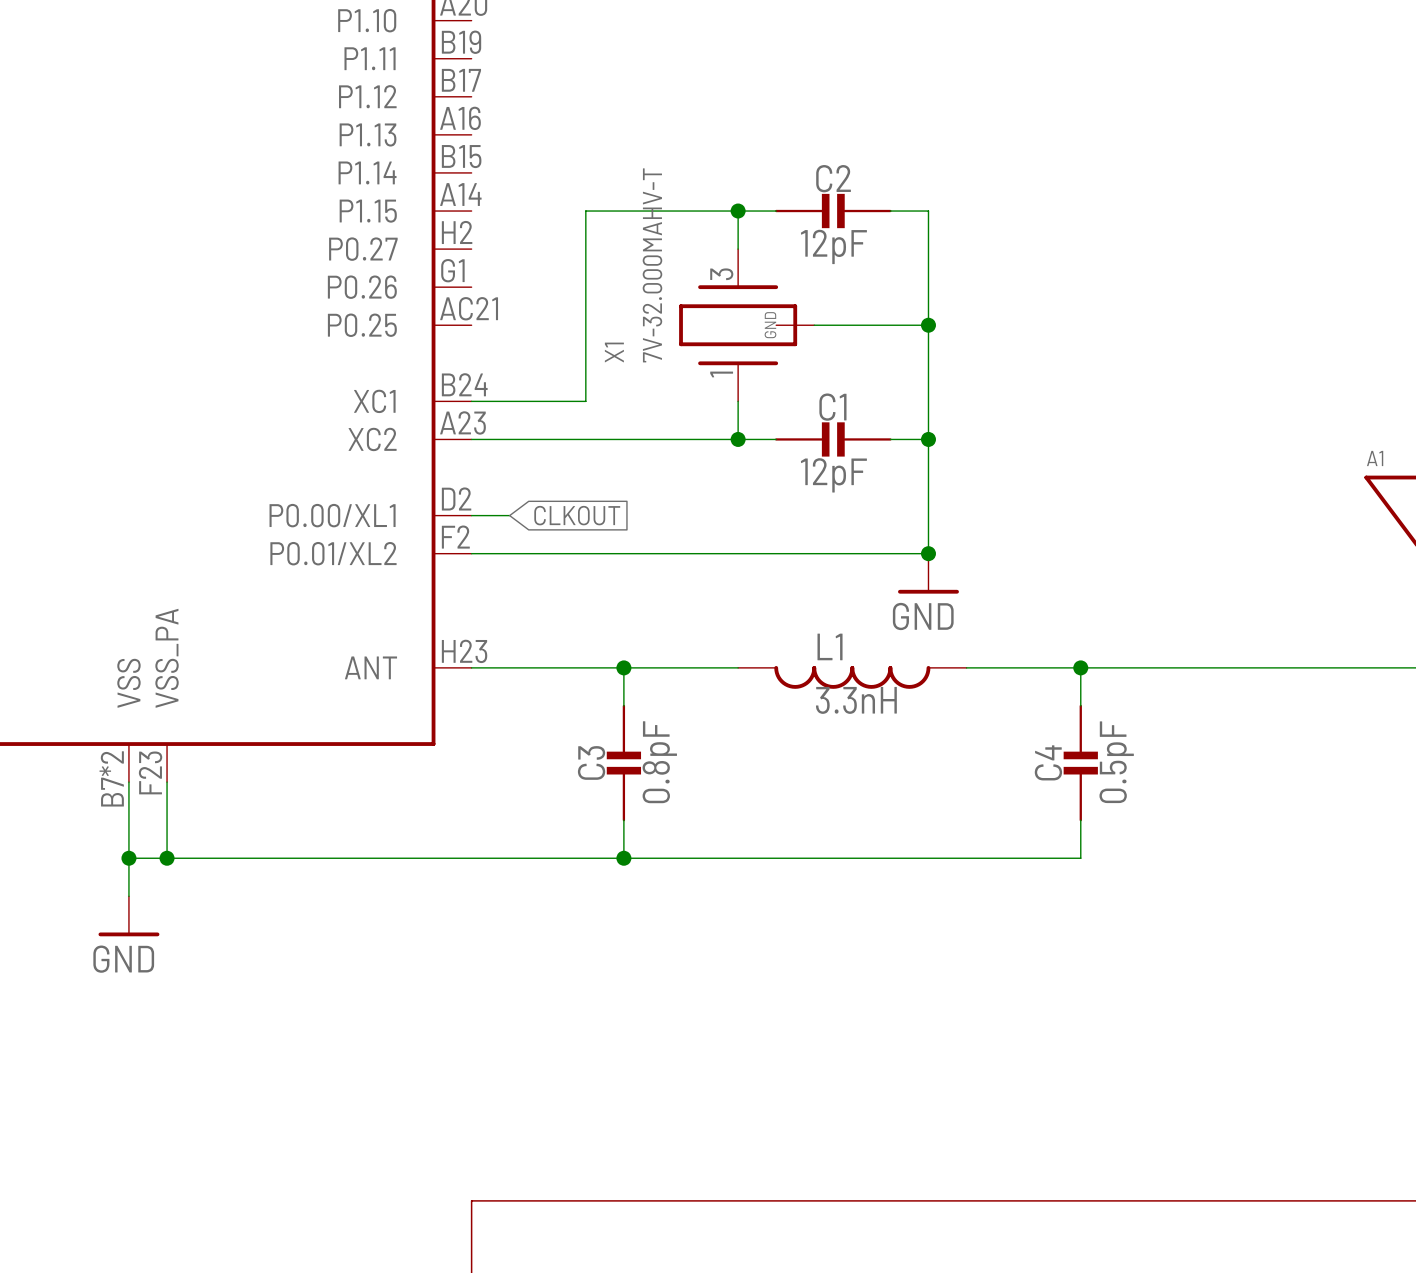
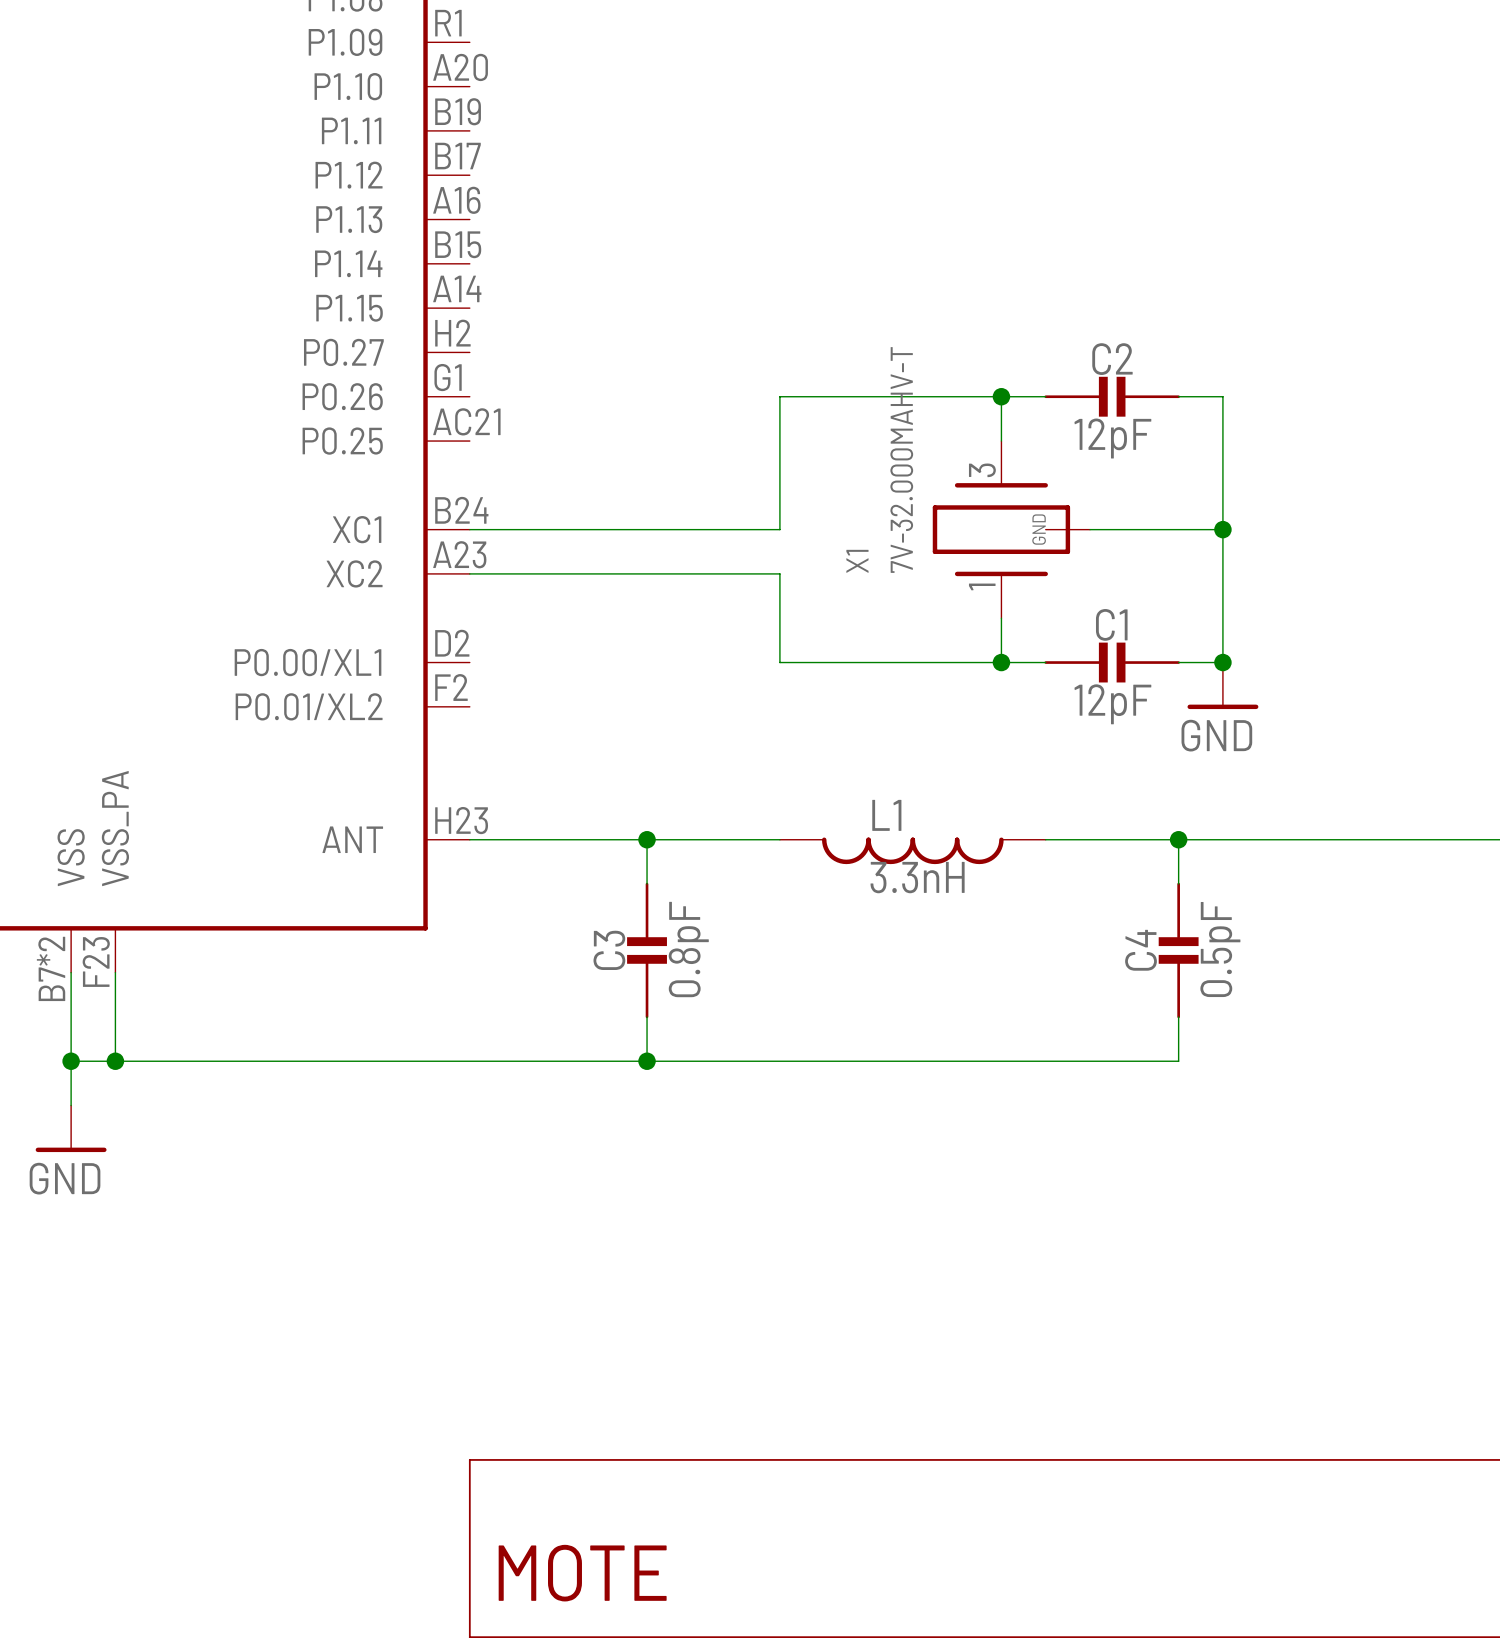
wire: (738, 211) (738, 249) -> none
junction: (738, 211) -> none
wire: (776, 211) (585, 211) (585, 401) -> (1045, 396) (779, 396) (779, 529) (602, 529)
C2 position: (833, 211) -> (1112, 396)
wire: (890, 211) (928, 211) (928, 287) -> none
wire: none -> (1178, 396) (1222, 396) (1222, 662) (1178, 662)
X1 position: (746, 325) -> (1011, 529)
wire: (814, 325) (928, 325) (928, 477) -> none
junction position: (928, 325) -> (1001, 396)
wire: (738, 401) (738, 439) (776, 439) -> none
wire: none -> (1090, 529) (1222, 529)
junction: none -> (1222, 529)
wire: none -> (779, 573) (779, 662) (1045, 662)
junction: (738, 439) -> none
C1 position: (833, 439) -> (1112, 662)
junction: (928, 439) -> none
wire: (471, 515) (509, 515) -> none
global label: CLKOUT (577, 515) -> none
wire: (928, 515) (928, 553) (471, 553) -> none
junction: none -> (1001, 662)
junction: none -> (1222, 662)
junction: (928, 553) -> none
power symbol position: GND (928, 573) -> GND (1222, 685)

